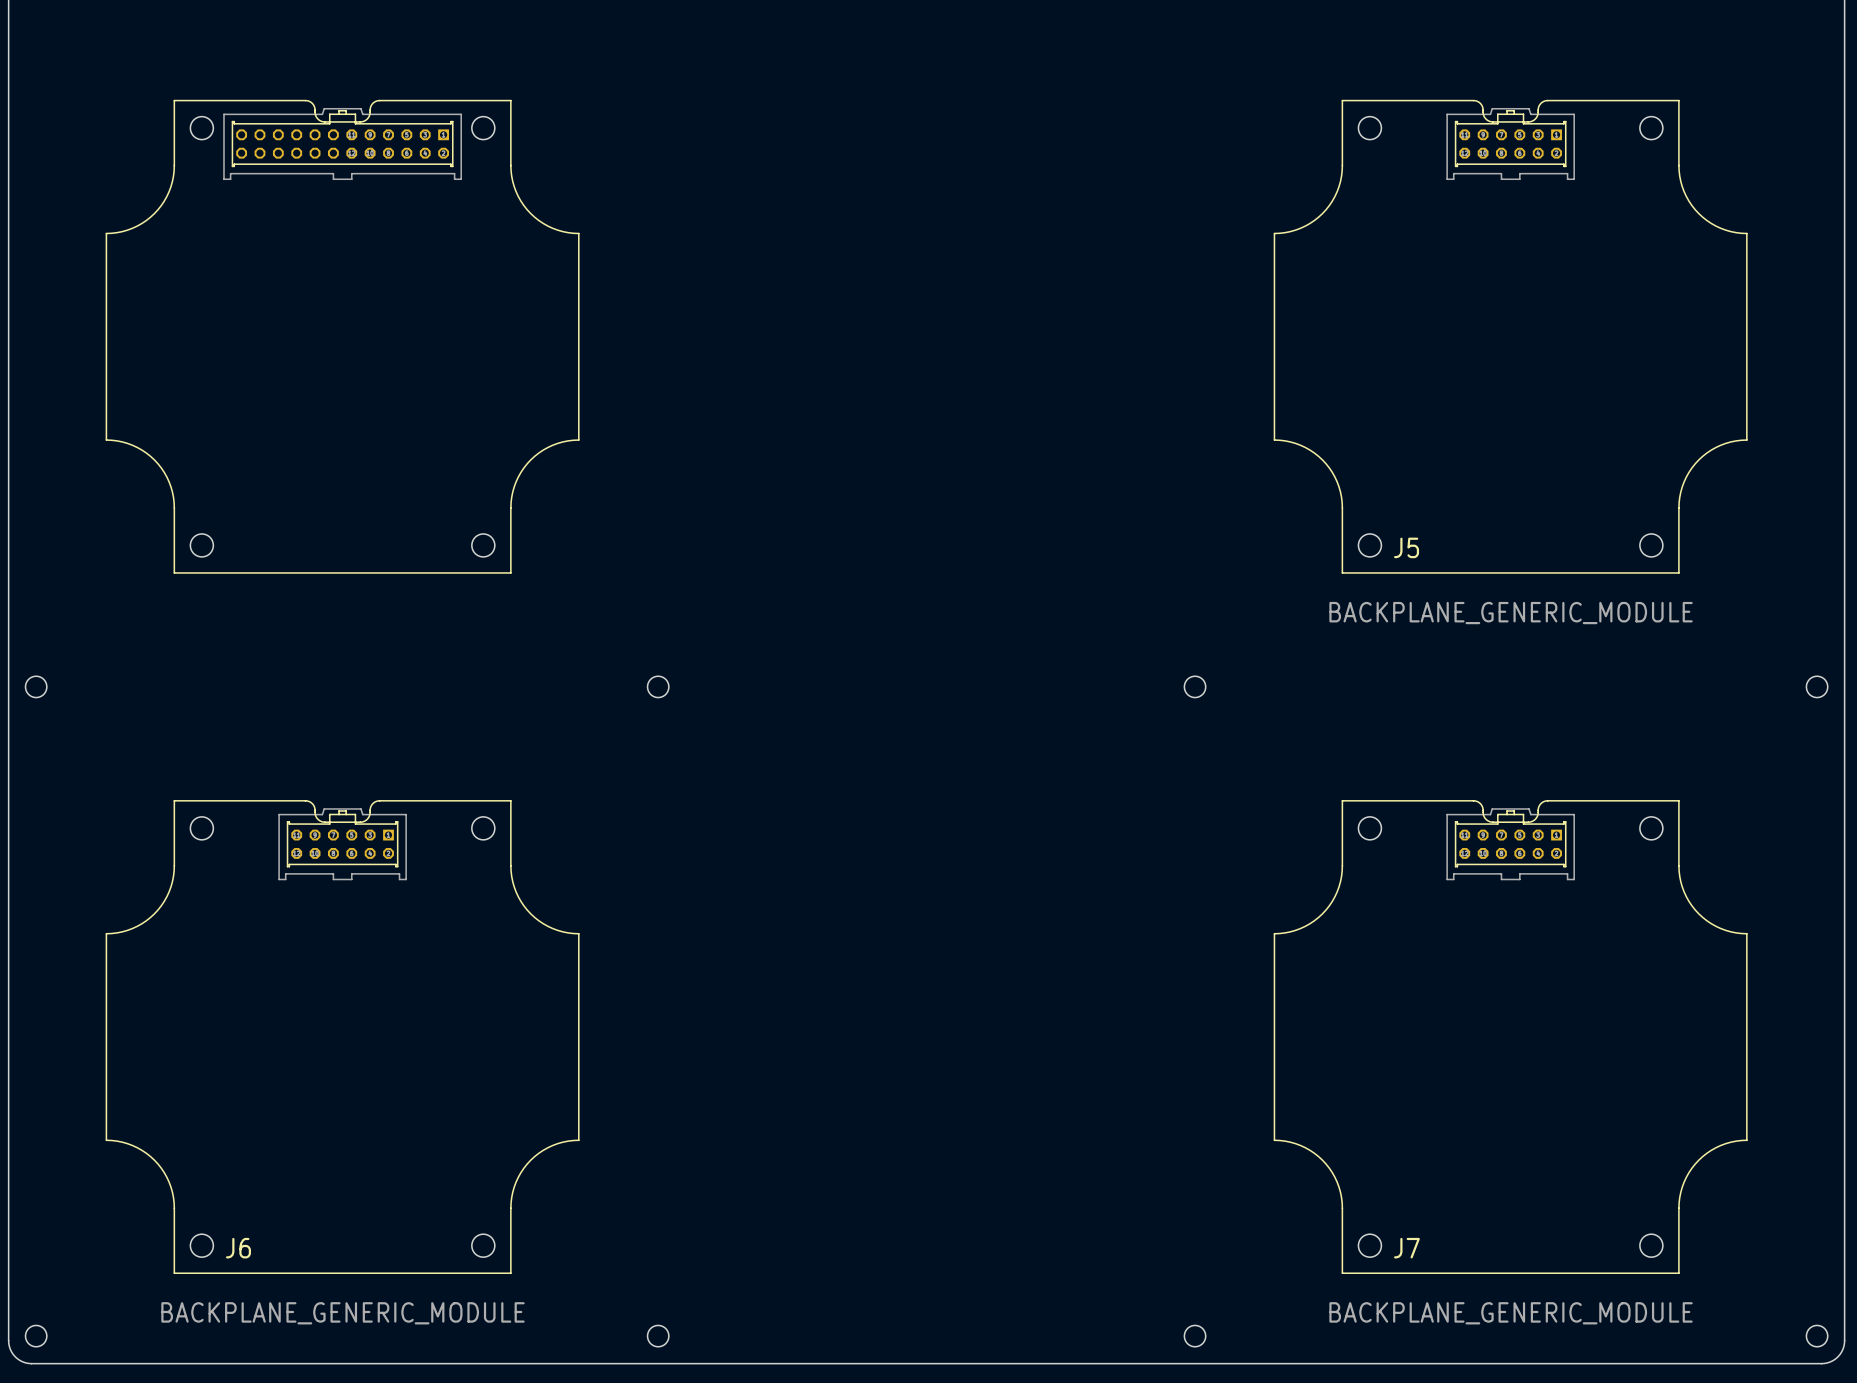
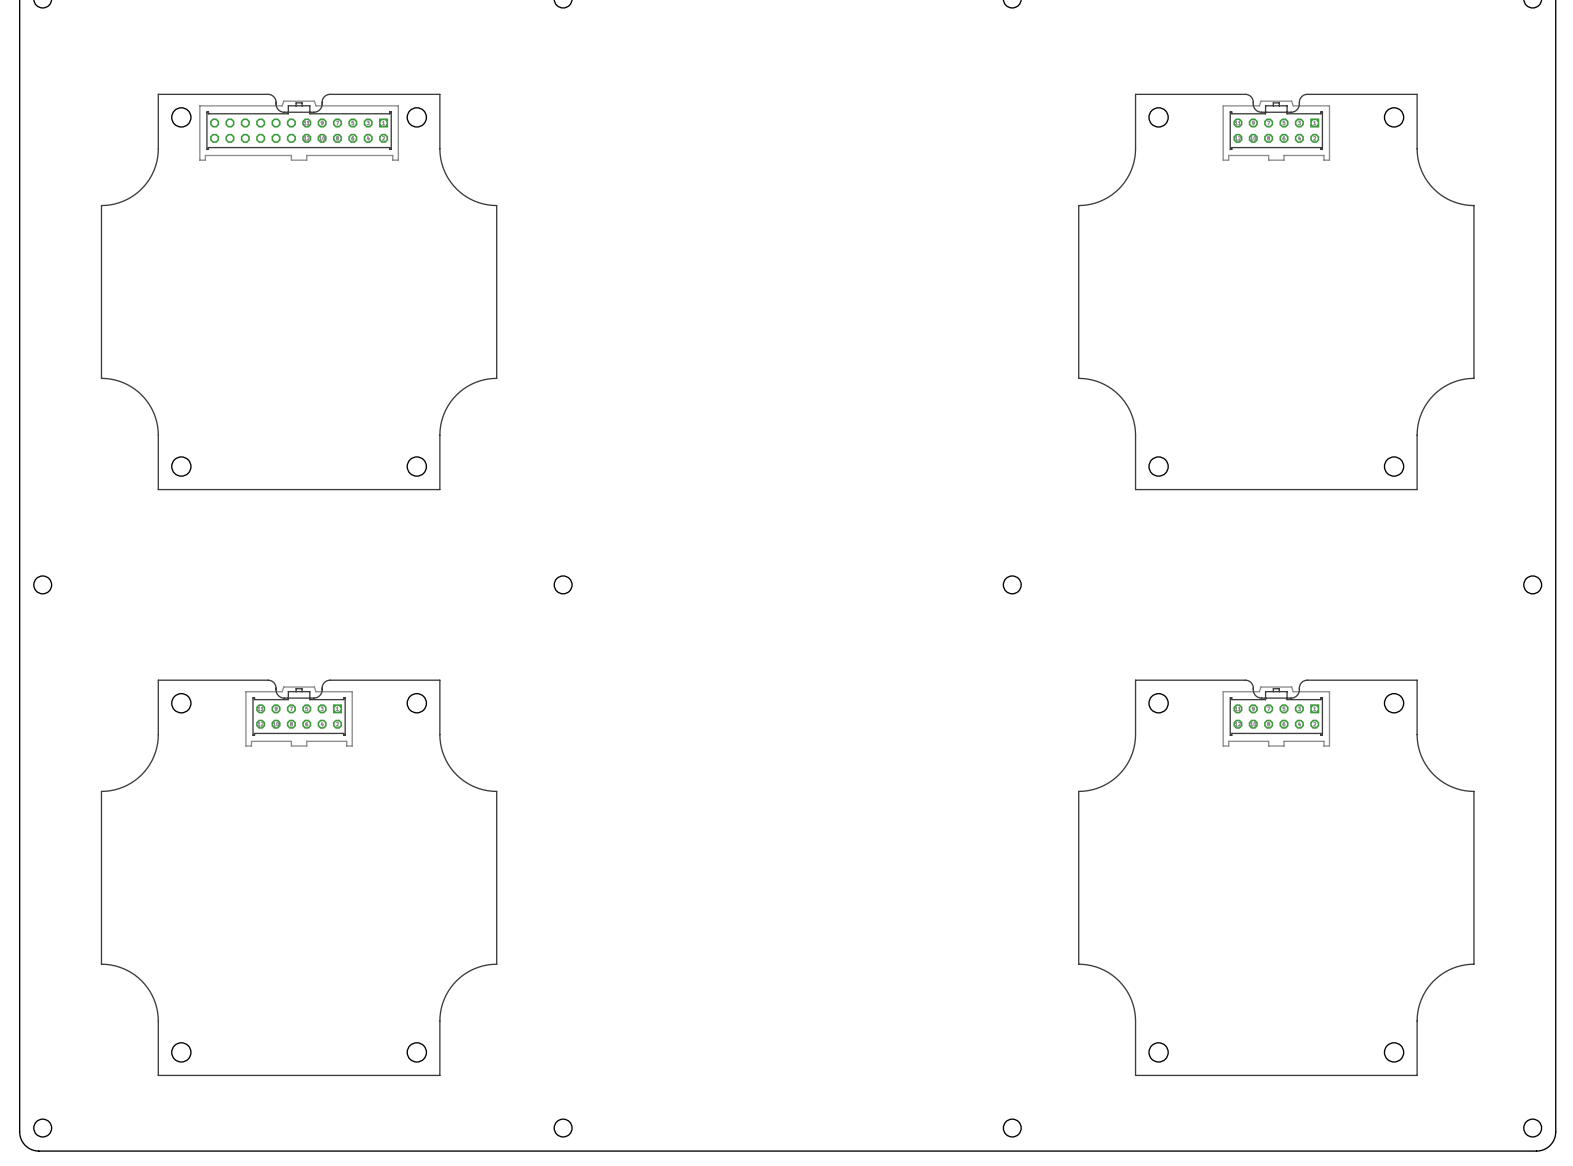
J5 name: J5 (1406, 547) -> none
J5 value: BACKPLANE_GENERIC_MODULE (1511, 613) -> none
J6 name: J6 (238, 1248) -> none
J7 name: J7 (1406, 1248) -> none
J6 value: BACKPLANE_GENERIC_MODULE (342, 1313) -> none
J7 value: BACKPLANE_GENERIC_MODULE (1511, 1313) -> none

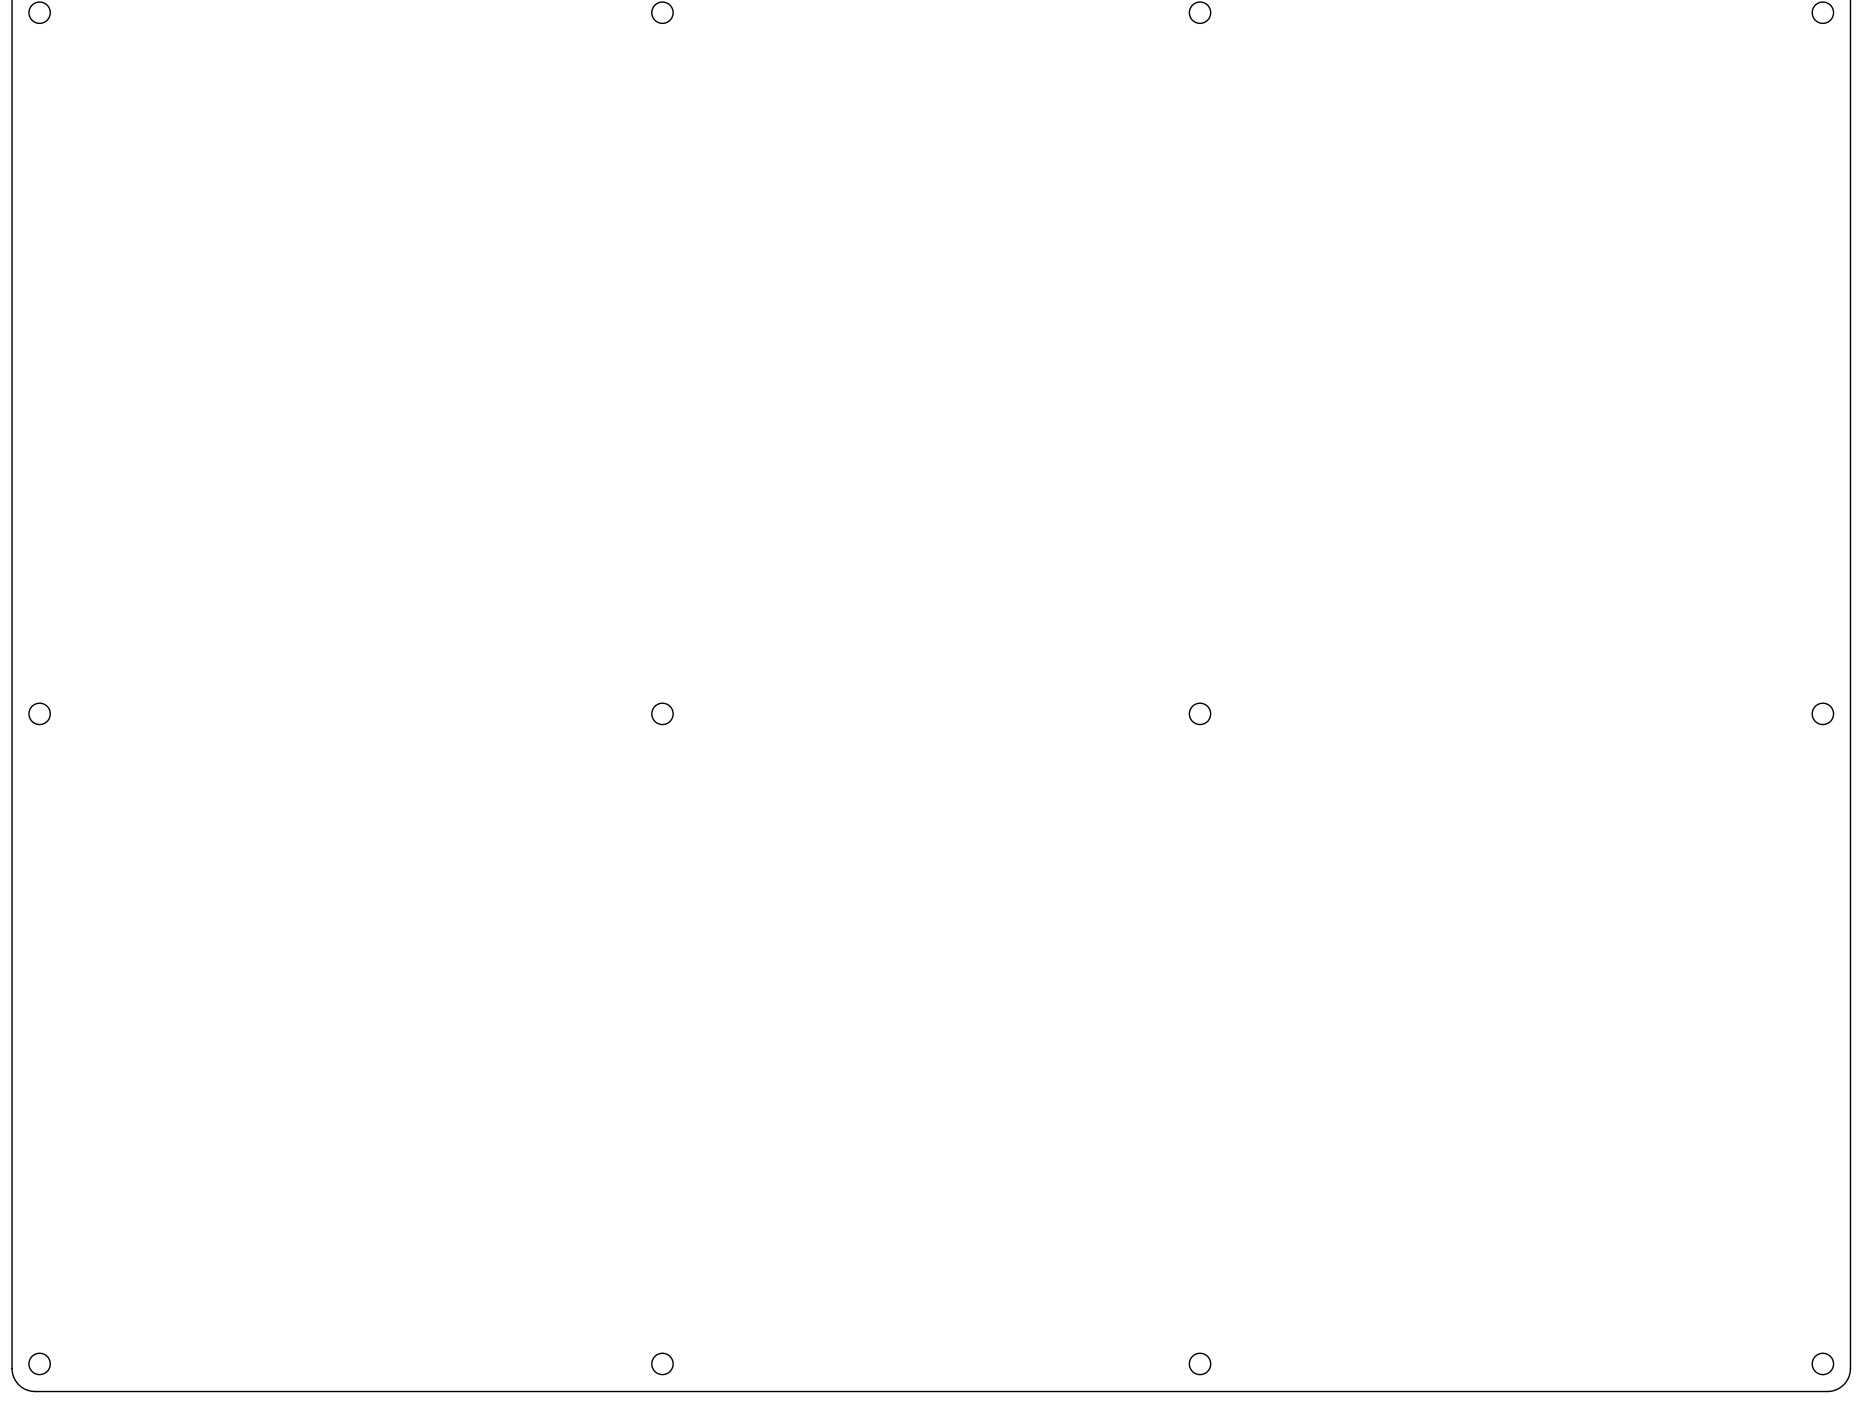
part: (299, 291) -> none
part: (1276, 291) -> none
part: (299, 877) -> none
part: (1276, 877) -> none

